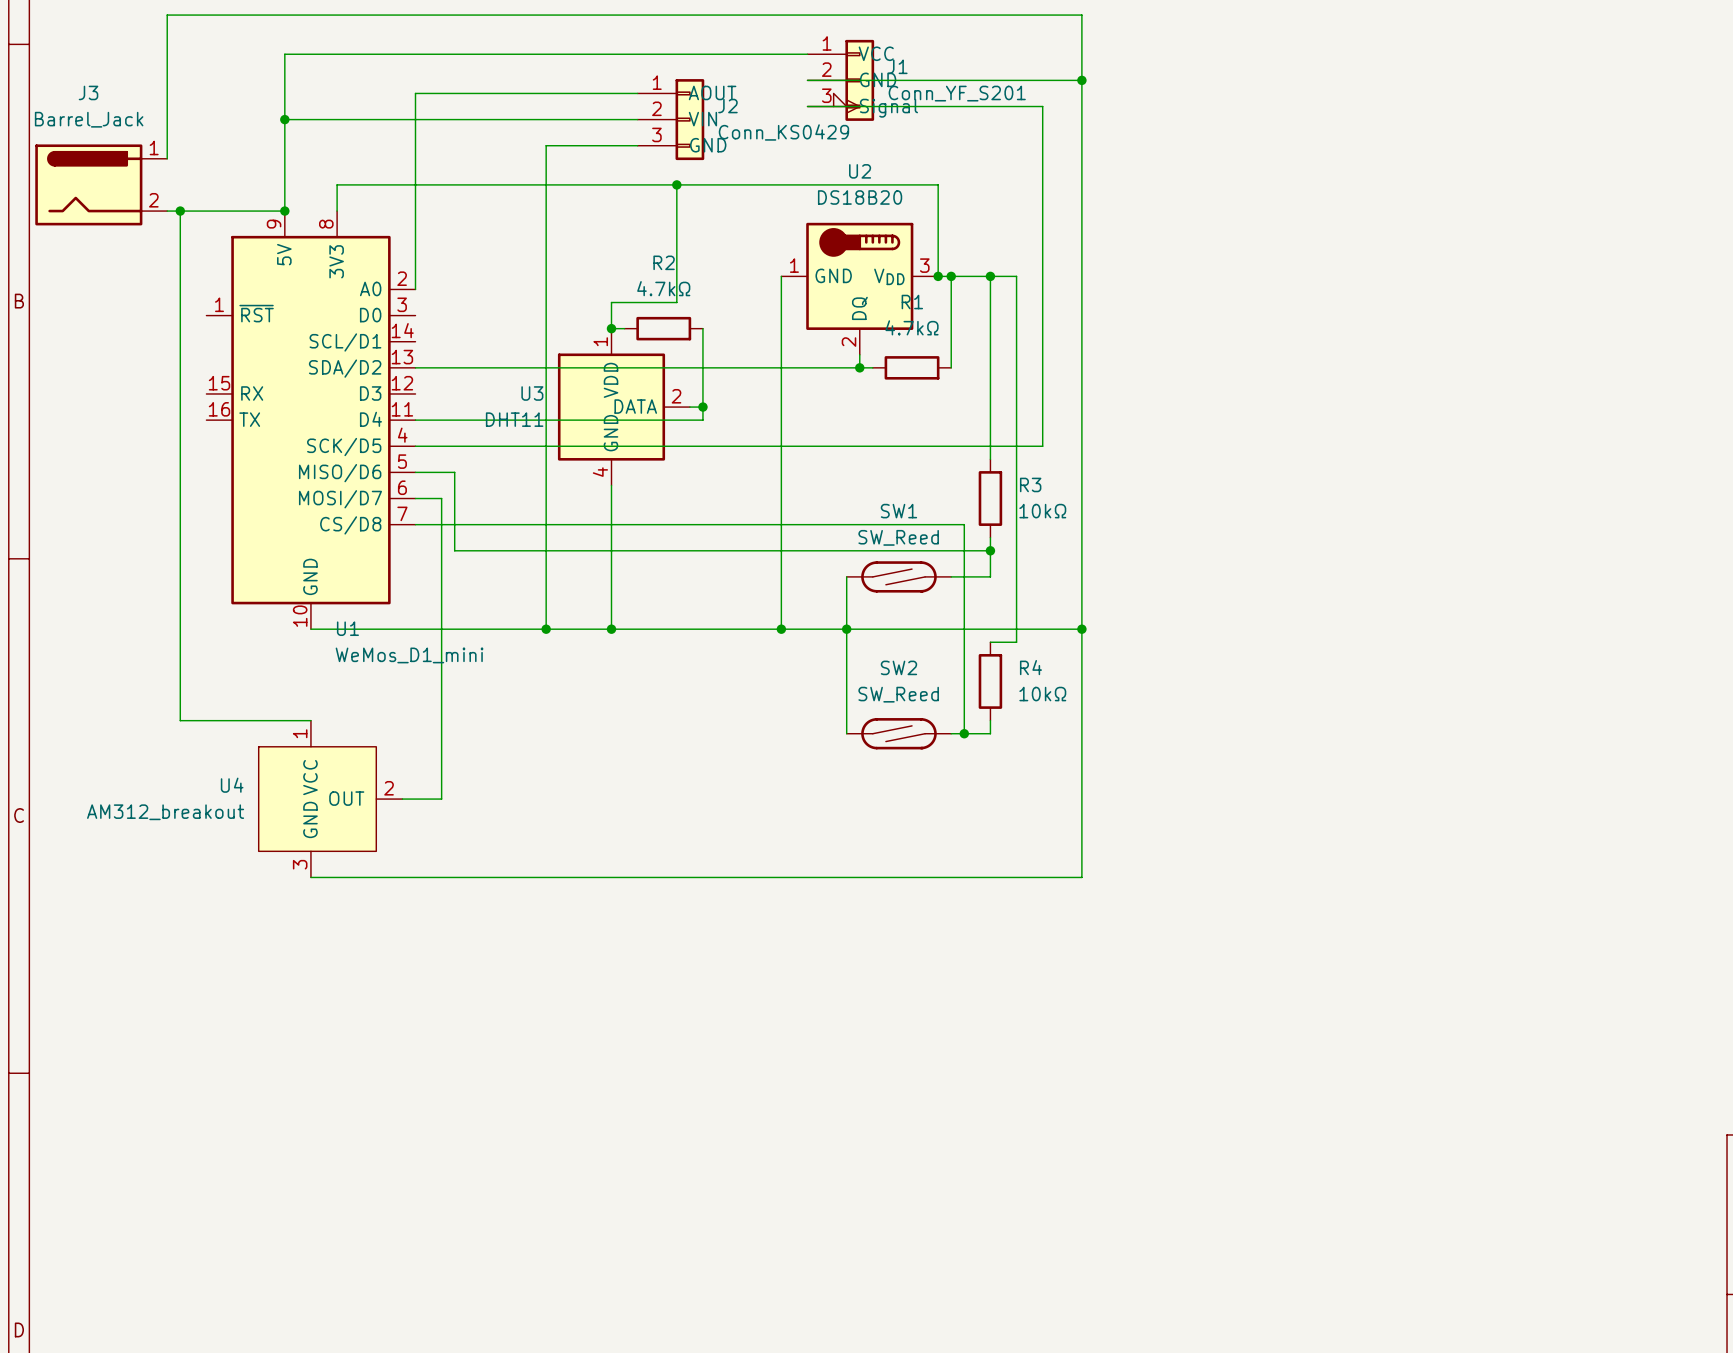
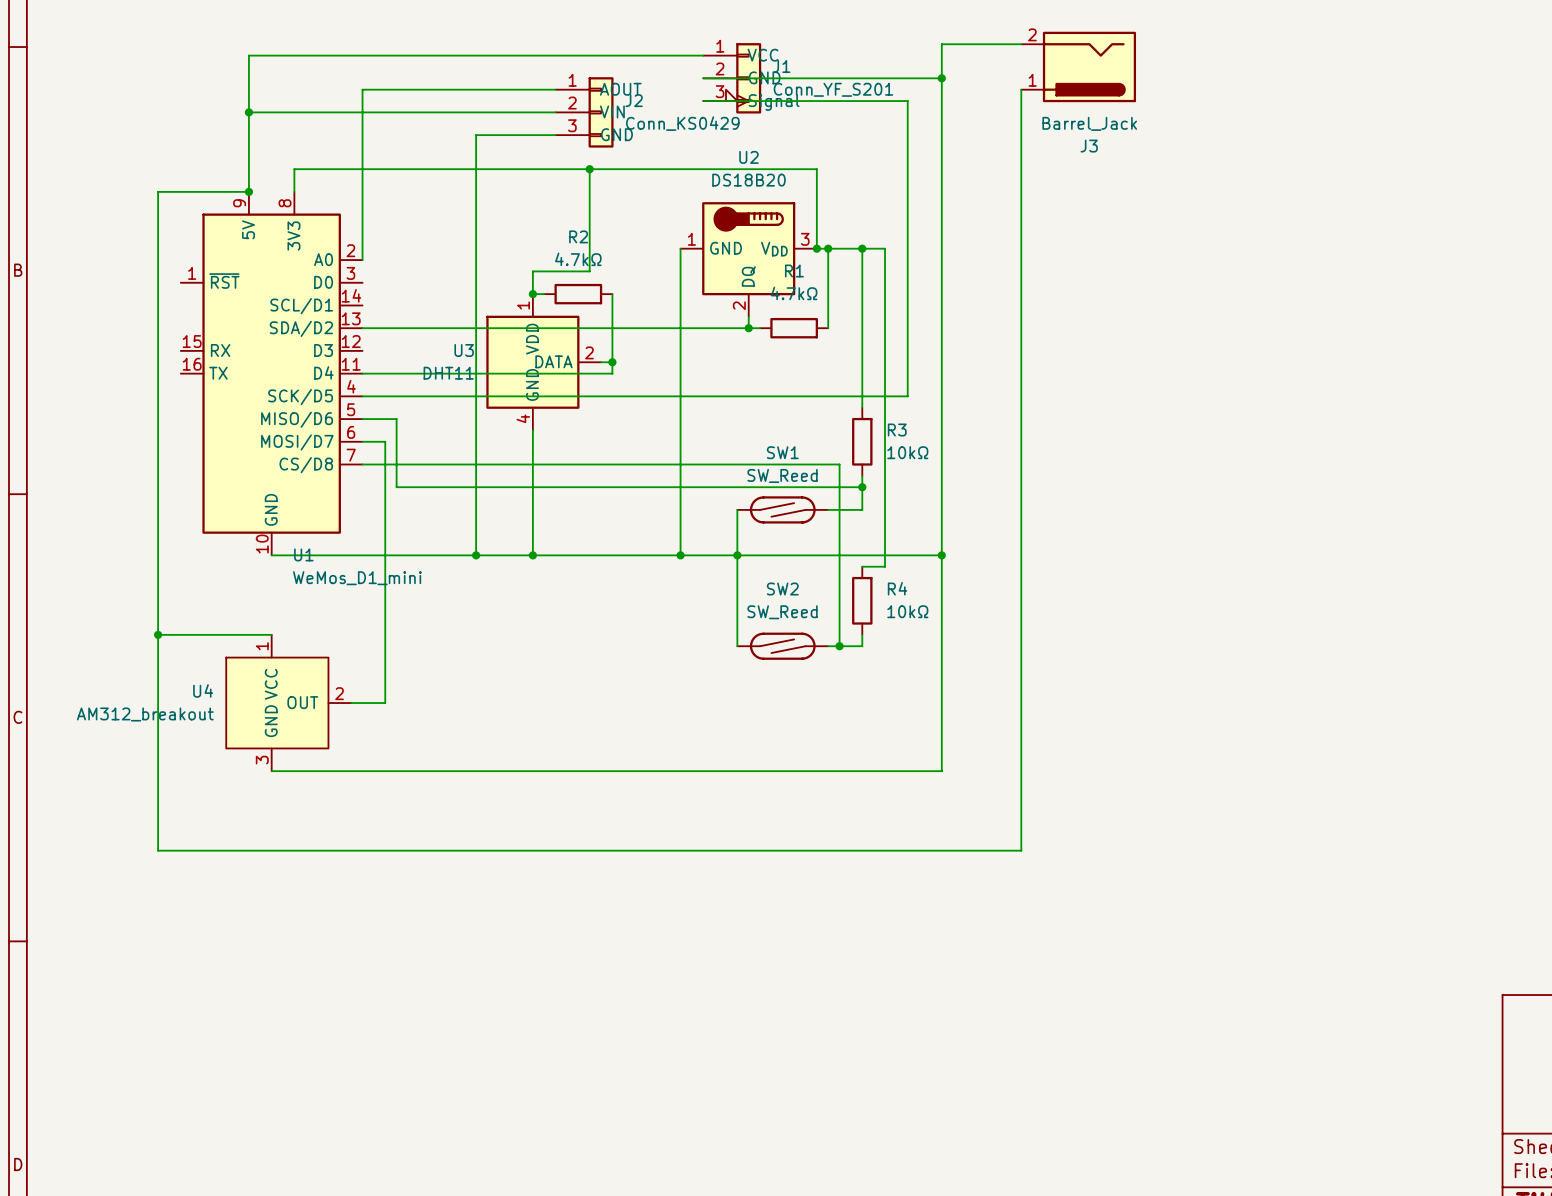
wire: (1081, 41) (1081, 15) (167, 15) (167, 158) -> (941, 44) (1021, 44)
wire: none -> (1021, 89) (1021, 850) (158, 850) (158, 634)
J3 rotation: 0° (88, 184) -> 180° (1089, 66)
J3 position: (101, 184) -> (1078, 66)
wire: (167, 211) (180, 211) -> none
junction: (180, 211) -> none
junction: none -> (158, 634)

